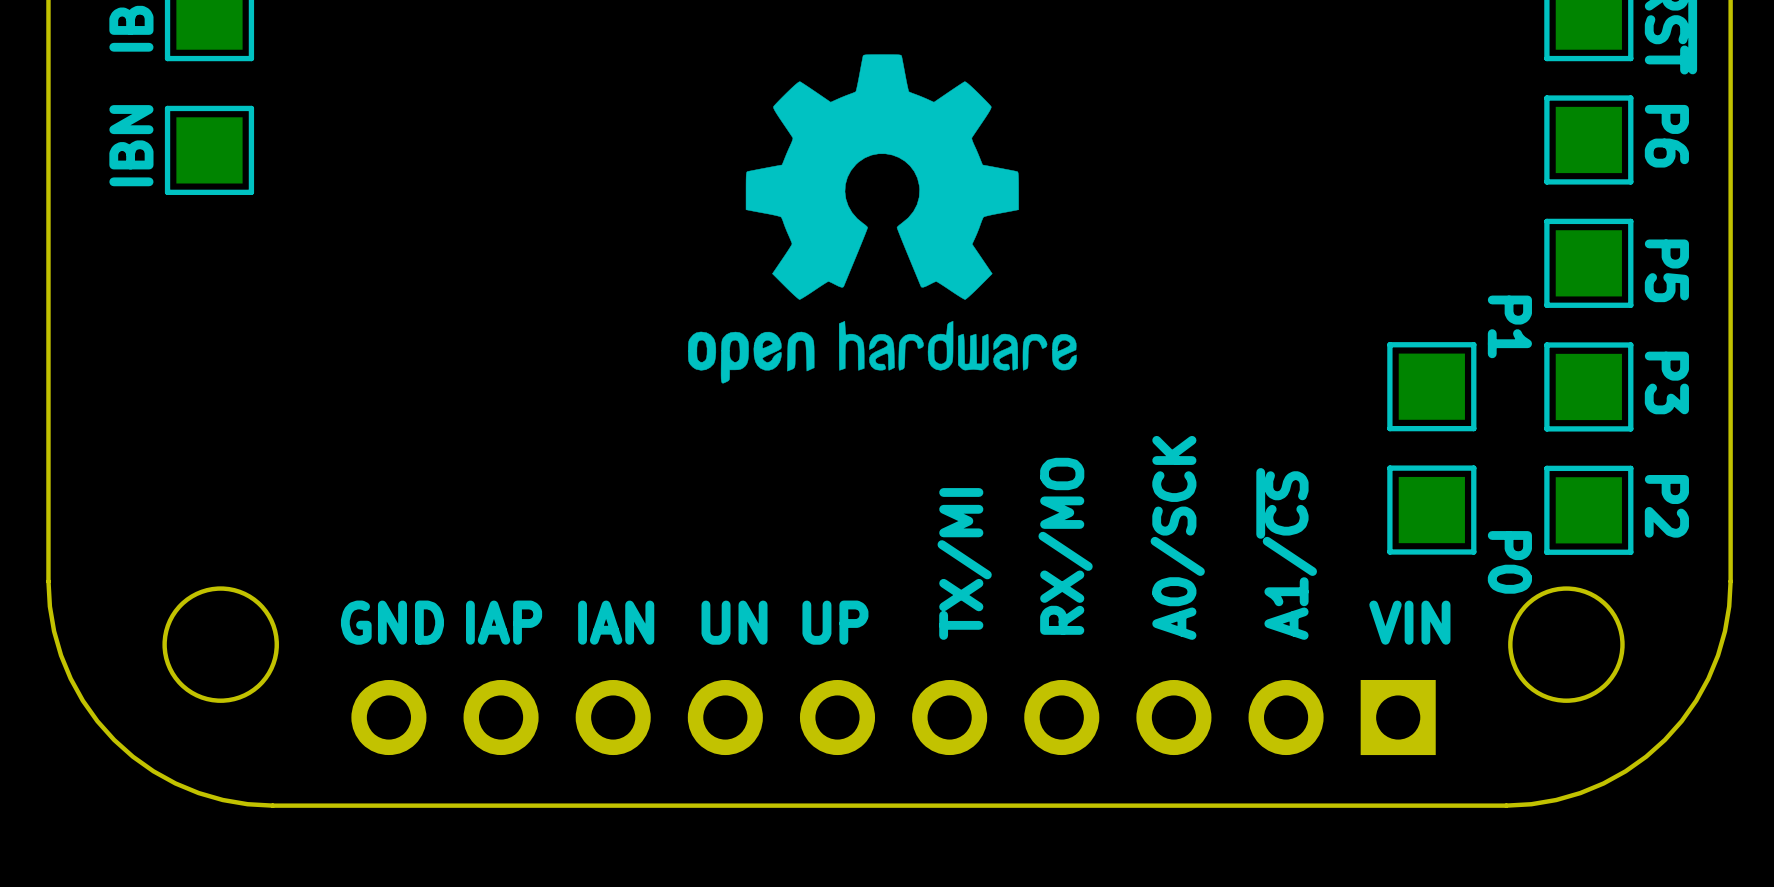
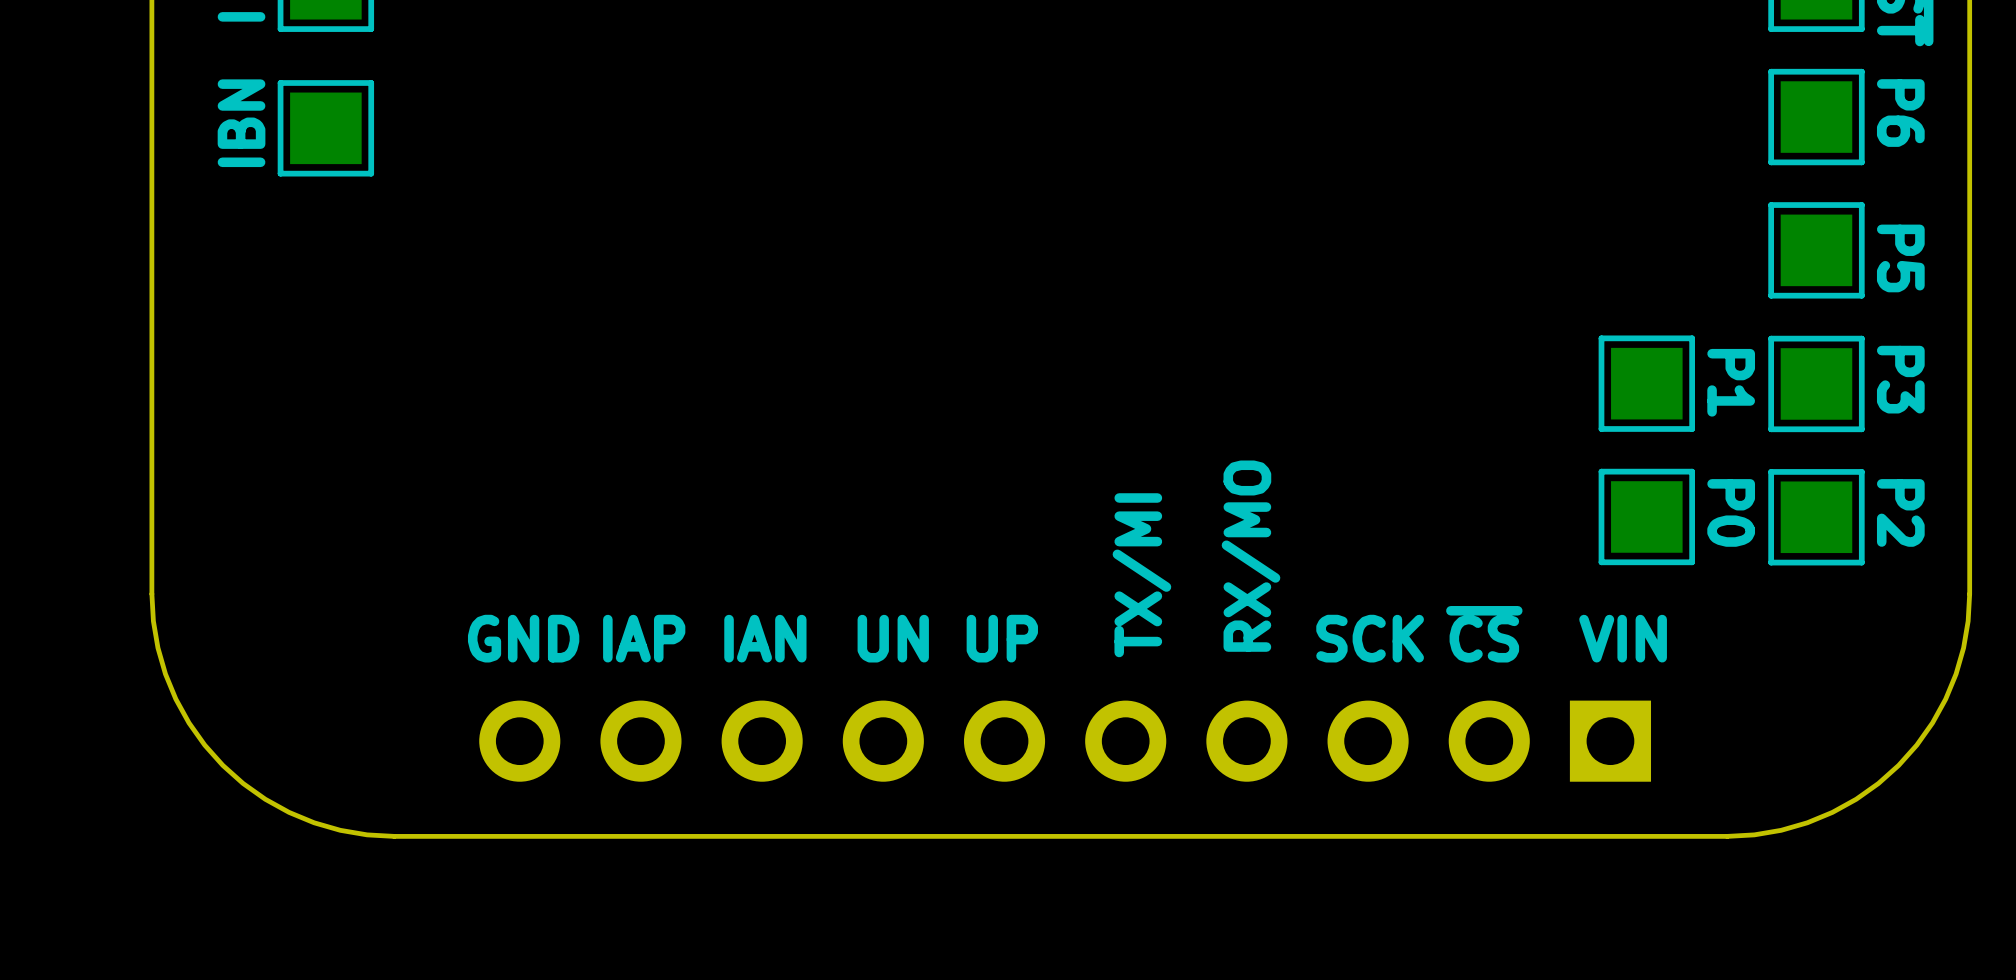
drawing: [688, 54, 1077, 384] -> none
text position: P1 (1509, 326) -> P1 (1731, 382)
text: A0/SCK (1177, 537) -> SCK (1370, 638)
text: A1/~{CS} (1286, 553) -> ~{CS} (1484, 634)
text position: P0 (1509, 562) -> P0 (1731, 512)
round board edge: [162, 586, 279, 703] -> none
round board edge: [1508, 586, 1625, 703] -> none

